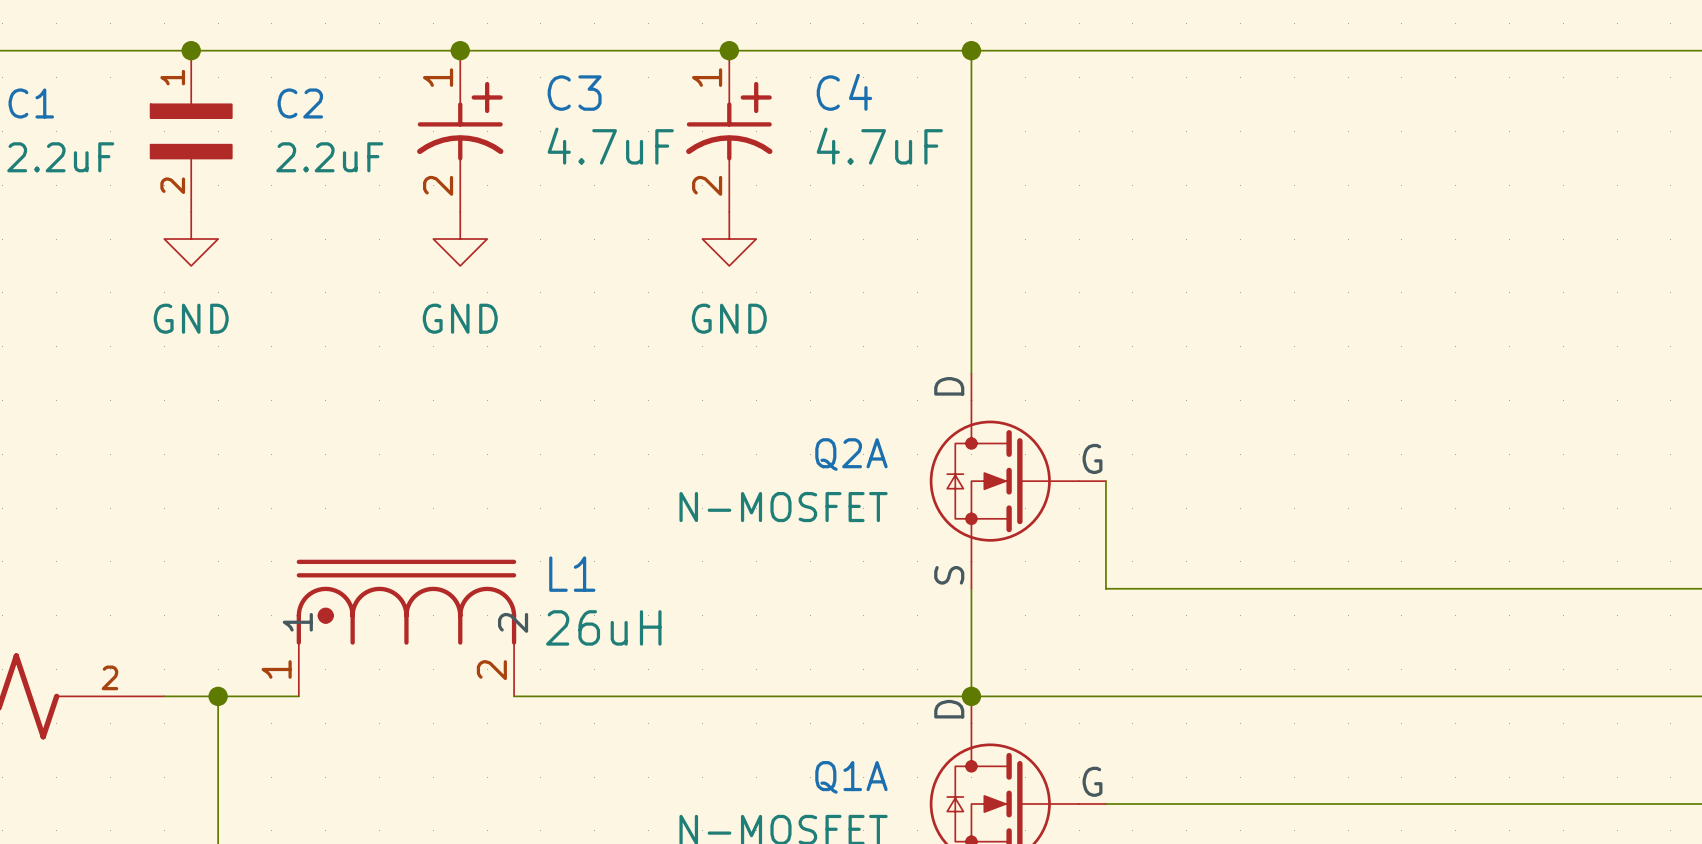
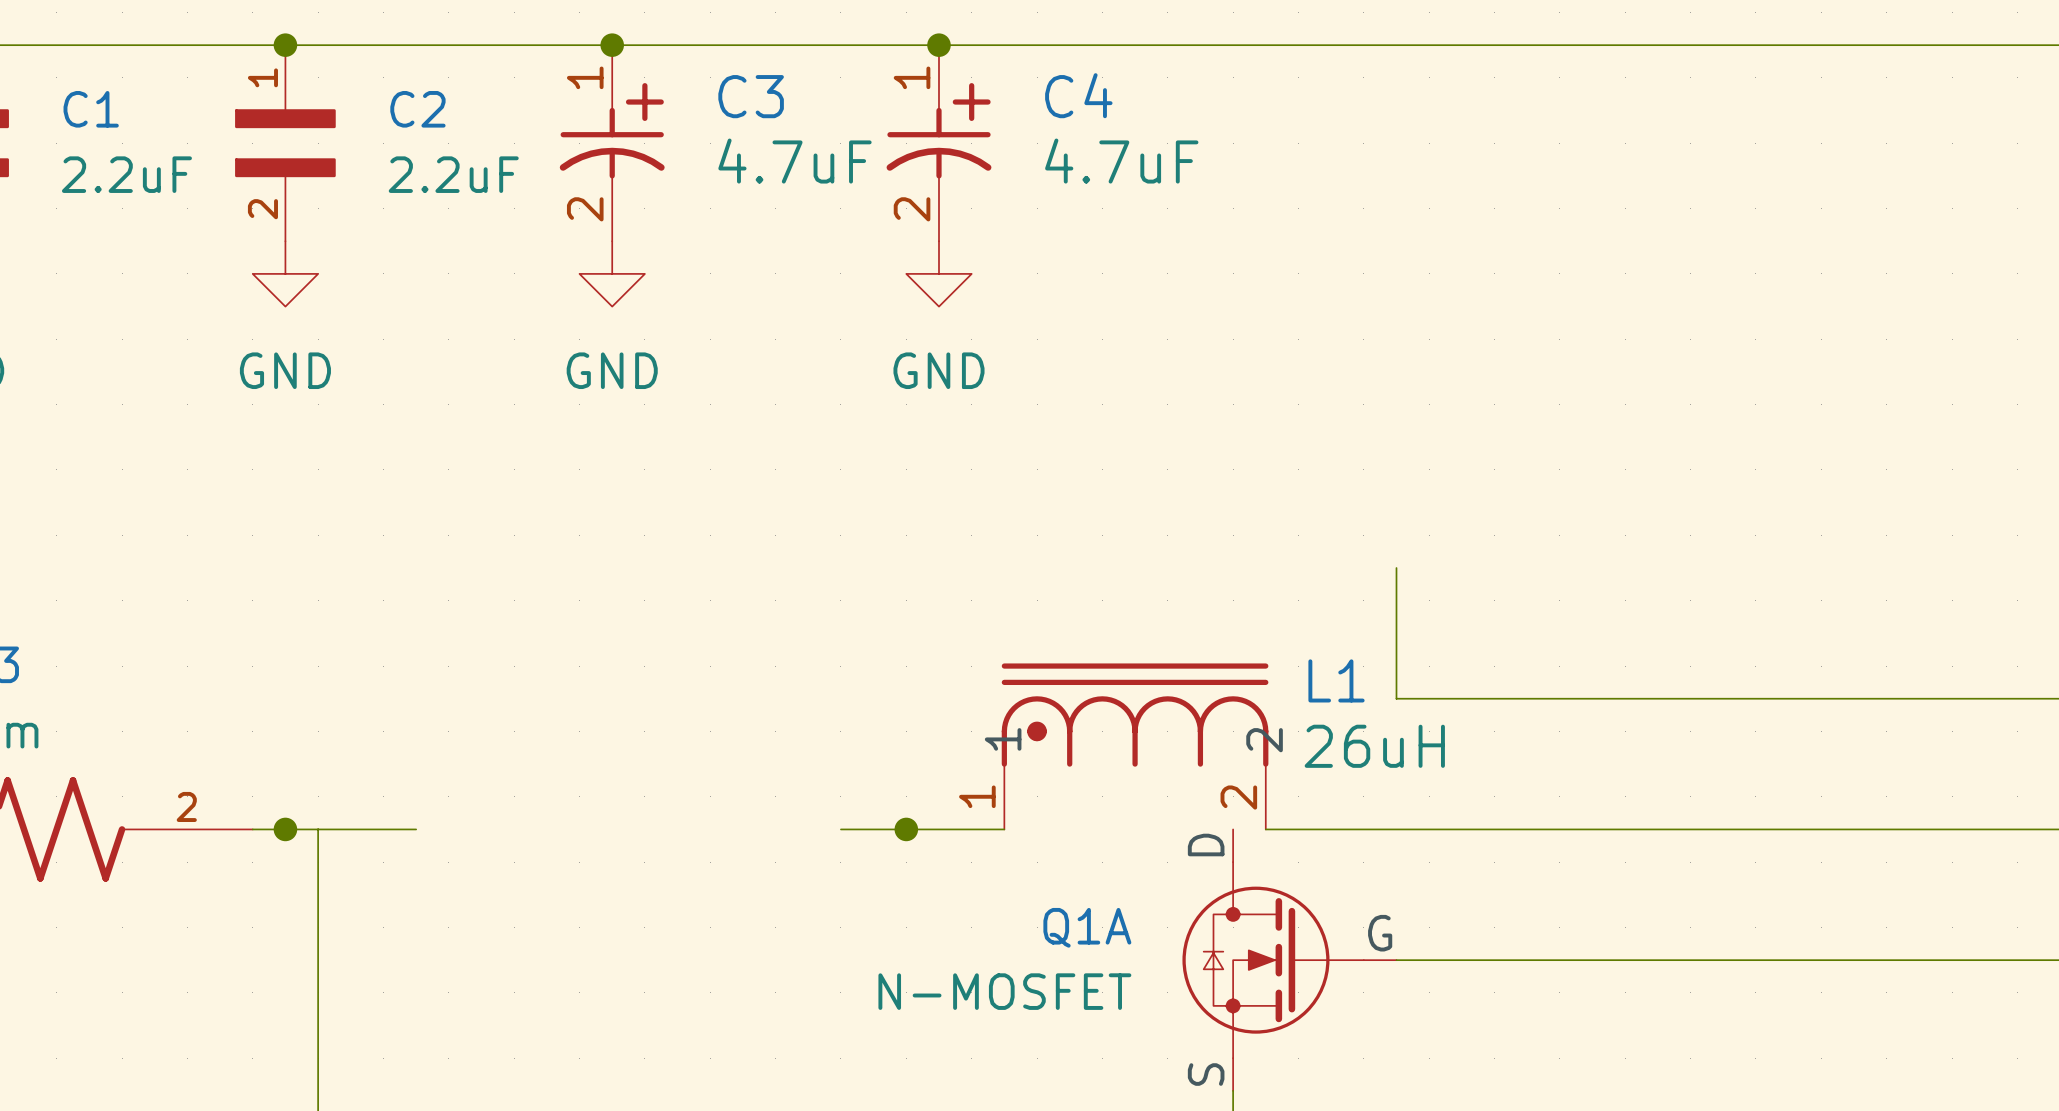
wire: (971, 50) (971, 373) -> none
junction: (971, 50) -> none
Q2A: N-MOSFET (1017, 481) -> none
wire: (971, 588) (971, 696) -> none
L1 position: (406, 628) -> (1135, 746)
junction position: (218, 696) -> (285, 829)
wire: (514, 696) (648, 696) -> none
junction: none -> (906, 829)
wire: (783, 696) (998, 696) -> none
junction: (971, 696) -> none

